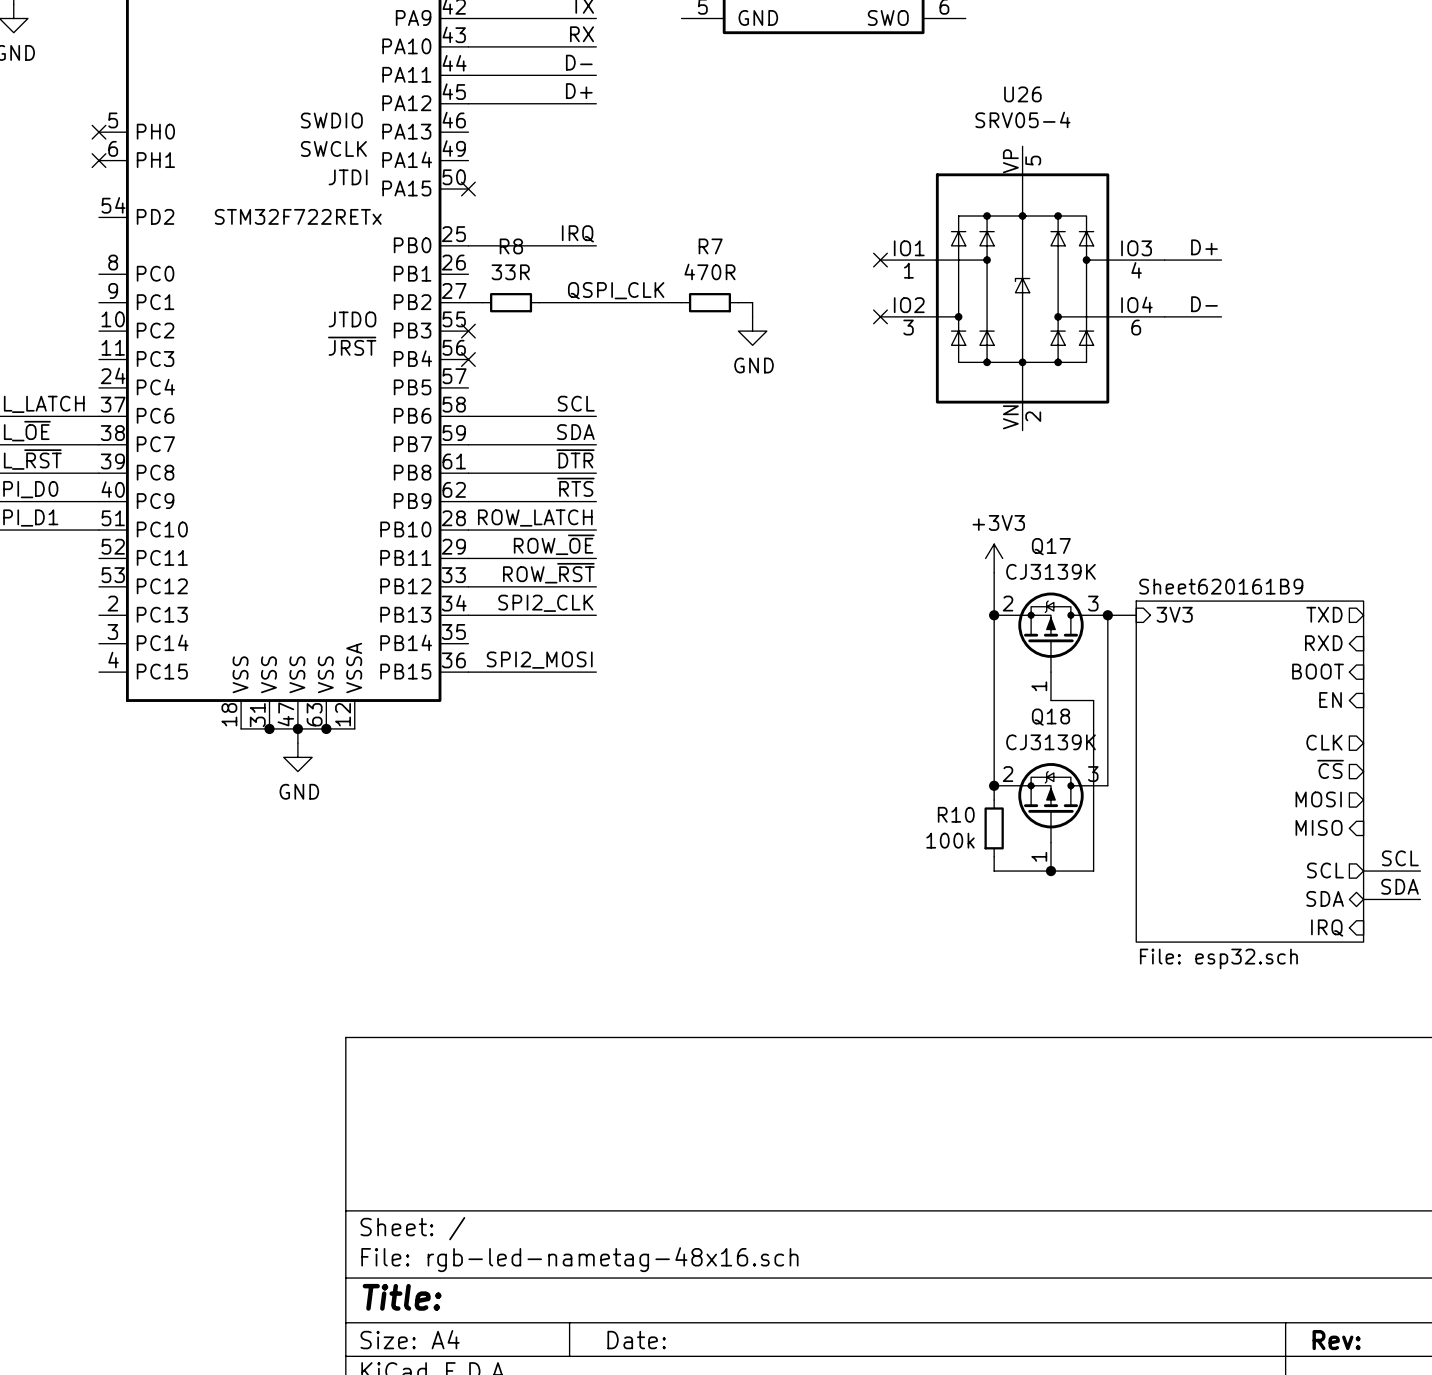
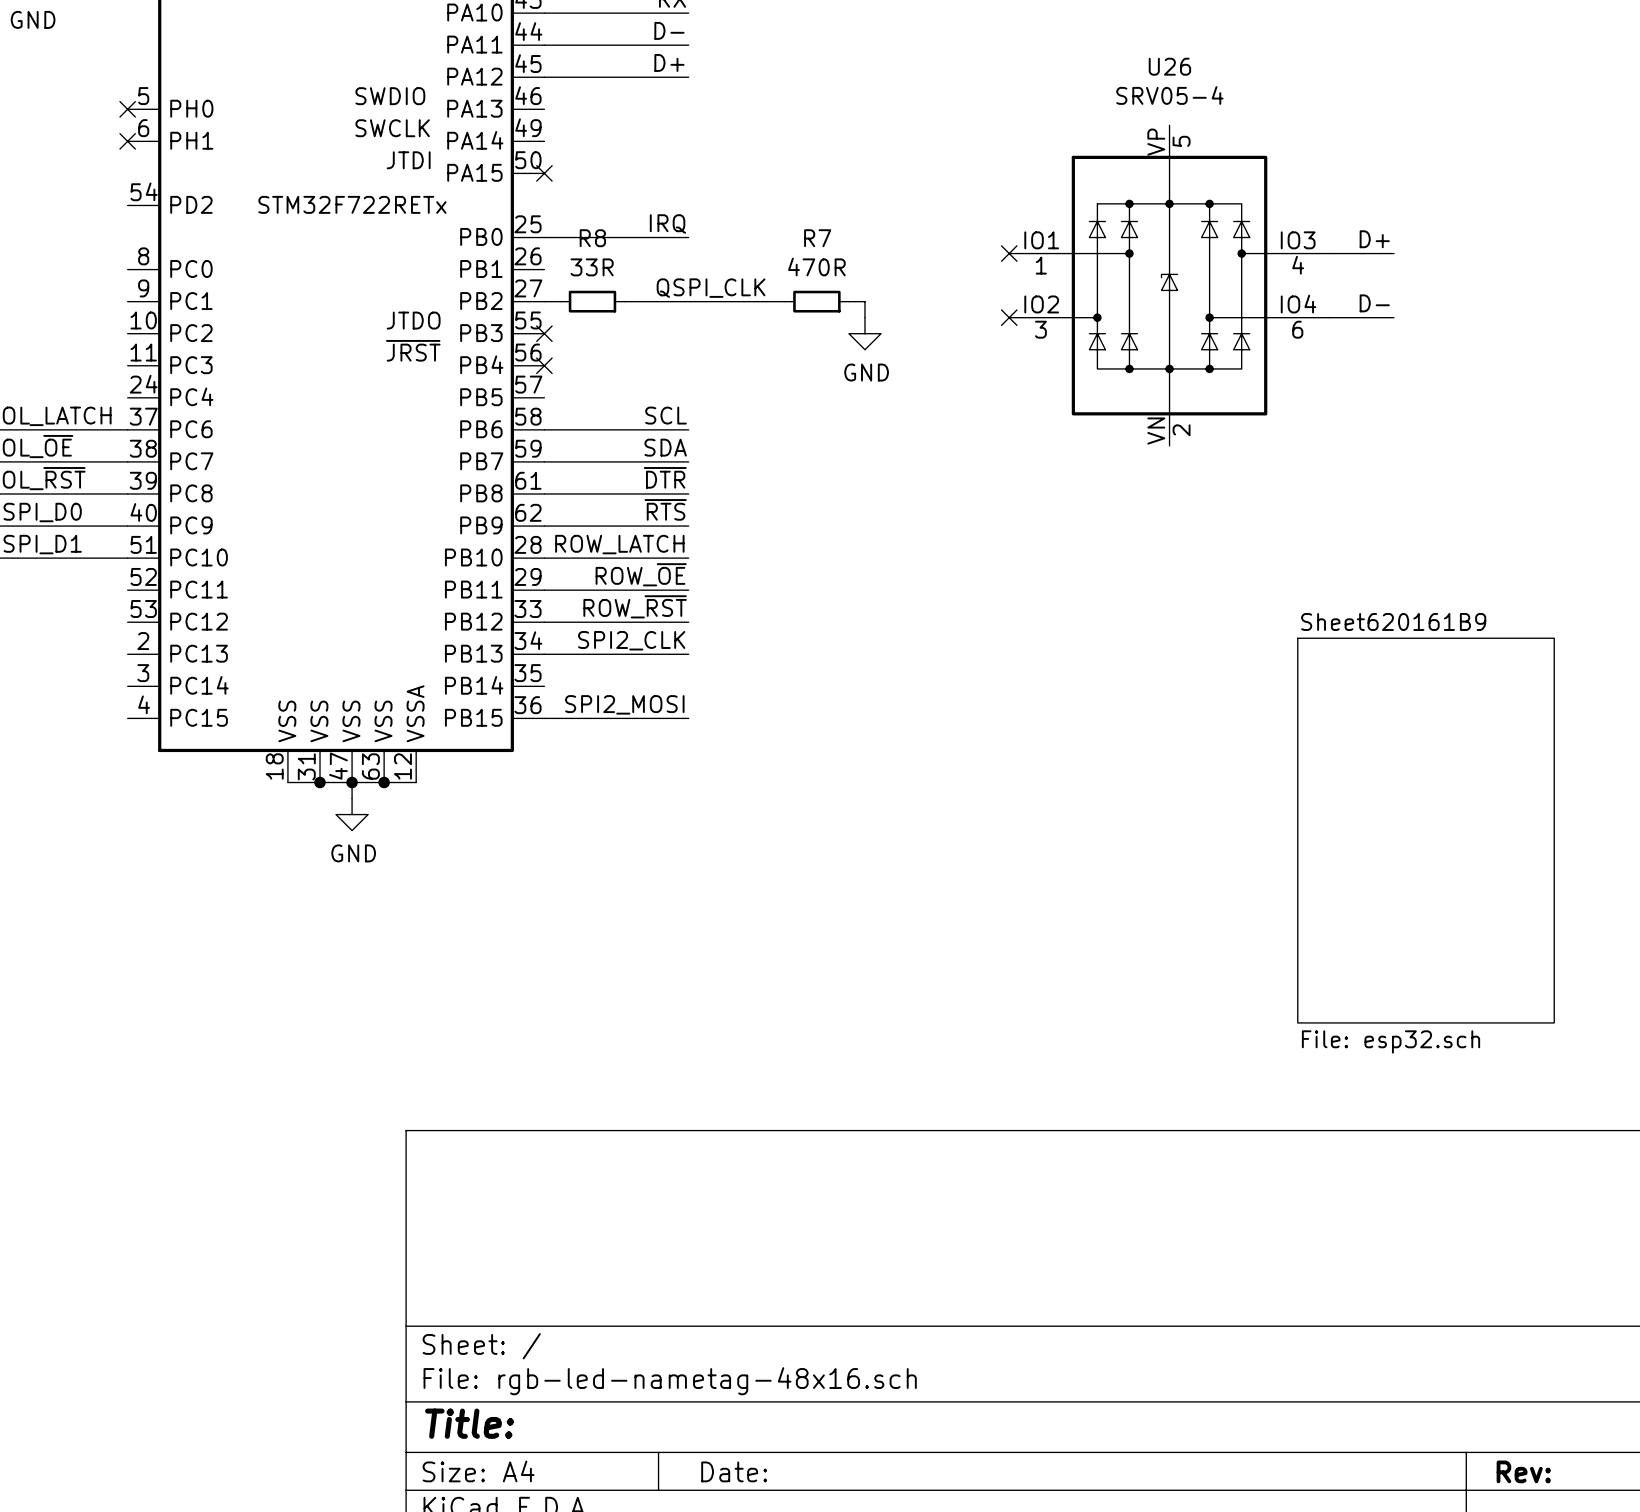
power symbol: +3V3 (994, 558) -> none
wire: (994, 572) (994, 799) -> none
sheet pin: 3V3 (1174, 614) -> none
sheet pin: TXD (1324, 614) -> none
junction: (994, 615) -> none
junction: (1107, 615) -> none
wire: (1136, 615) (1107, 615) (1107, 785) -> none
sheet pin: RXD (1323, 643) -> none
Q17: CJ3139K (1050, 646) -> none
sheet pin: BOOT (1318, 671) -> none
sheet pin: EN (1330, 699) -> none
wire: (1050, 700) (1093, 700) (1093, 871) (994, 871) (994, 856) -> none
sheet pin: CLK (1324, 742) -> none
sheet pin: ~{CS} (1330, 769) -> none
junction: (994, 785) -> none
sheet pin: MOSI (1318, 799) -> none
Q18: CJ3139K (1050, 817) -> none
sheet pin: MISO (1319, 827) -> none
R10: 100k (994, 828) -> none
label: SCL (1400, 858) -> none
sheet pin: SCL (1325, 870) -> none
junction: (1050, 871) -> none
wire: (1363, 871) (1420, 871) -> none
label: SDA (1400, 886) -> none
sheet pin: SDA (1325, 898) -> none
wire: (1363, 899) (1420, 899) -> none
sheet pin: IRQ (1327, 928) -> none

